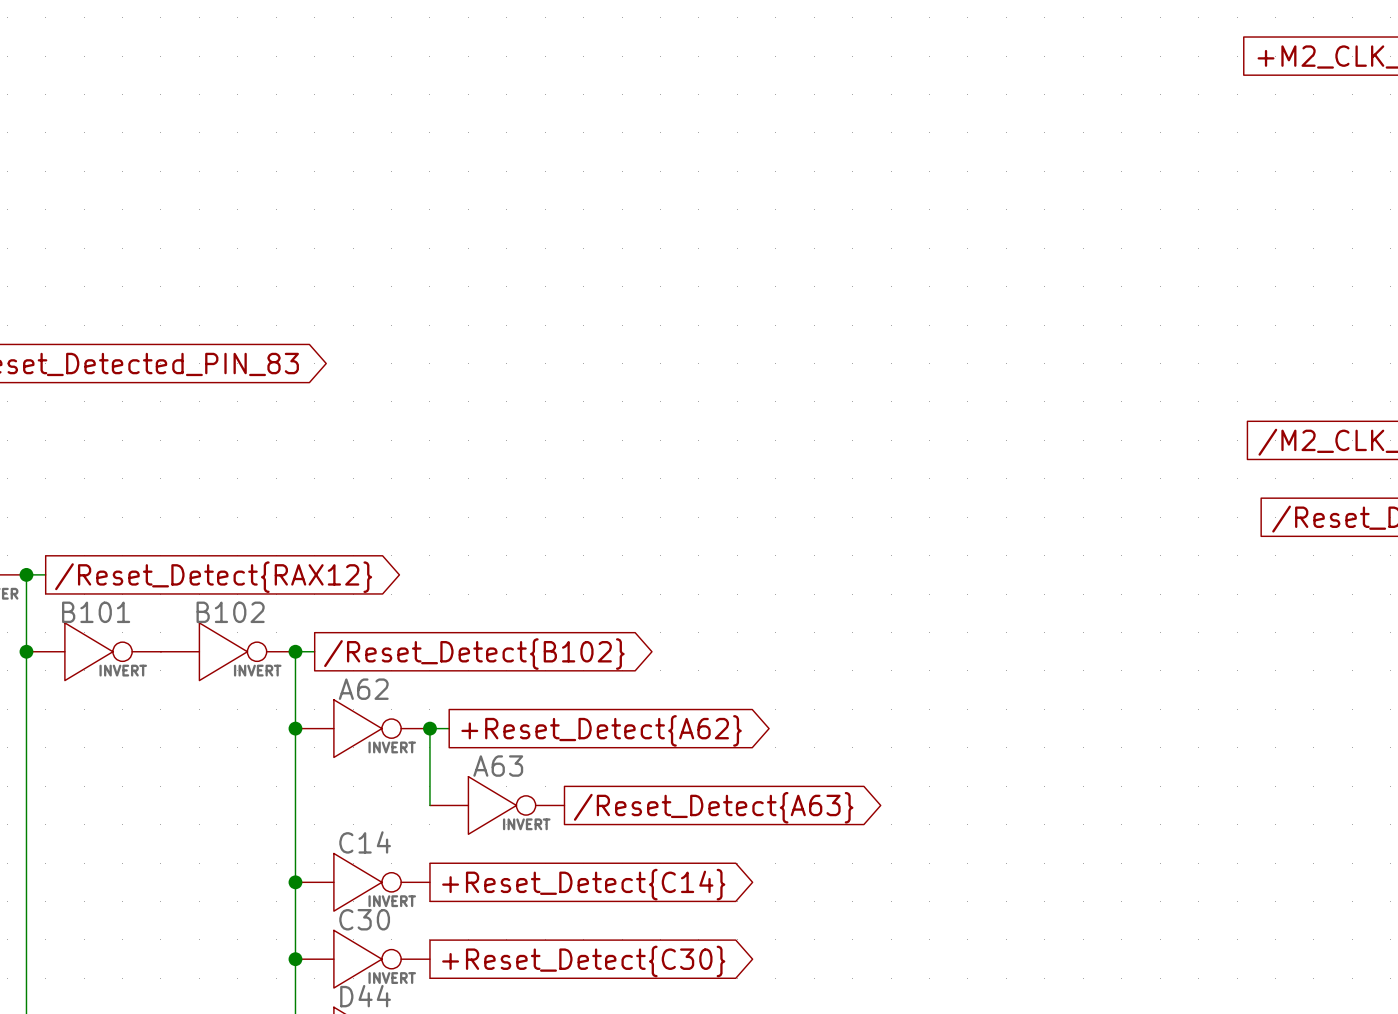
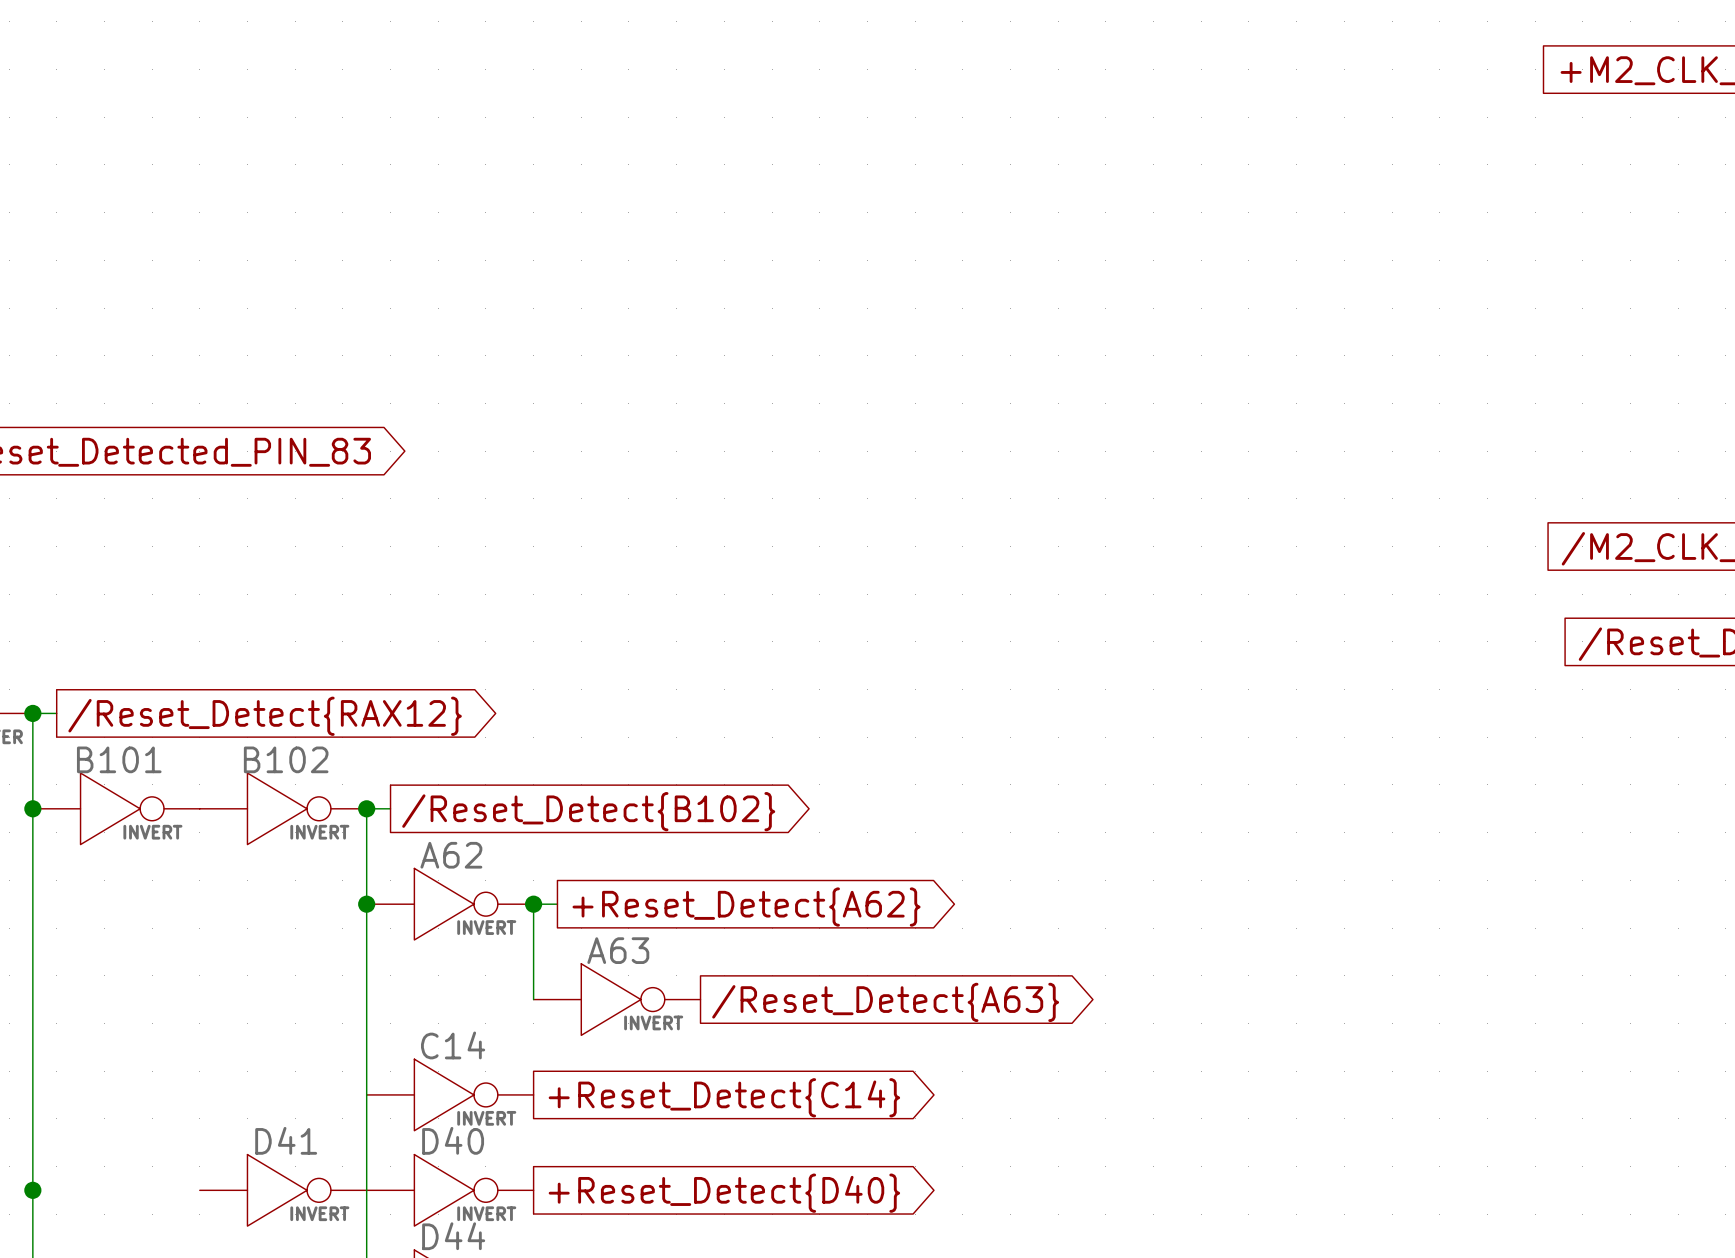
junction: (295, 882) -> none
C30 name: C30 (364, 919) -> D40 (453, 1140)
junction: none -> (32, 1190)
D41: none -> INVERT (283, 1190)
junction: (295, 959) -> none
global label: +Reset_Detect{C30} (583, 961) -> +Reset_Detect{D40} (724, 1193)

